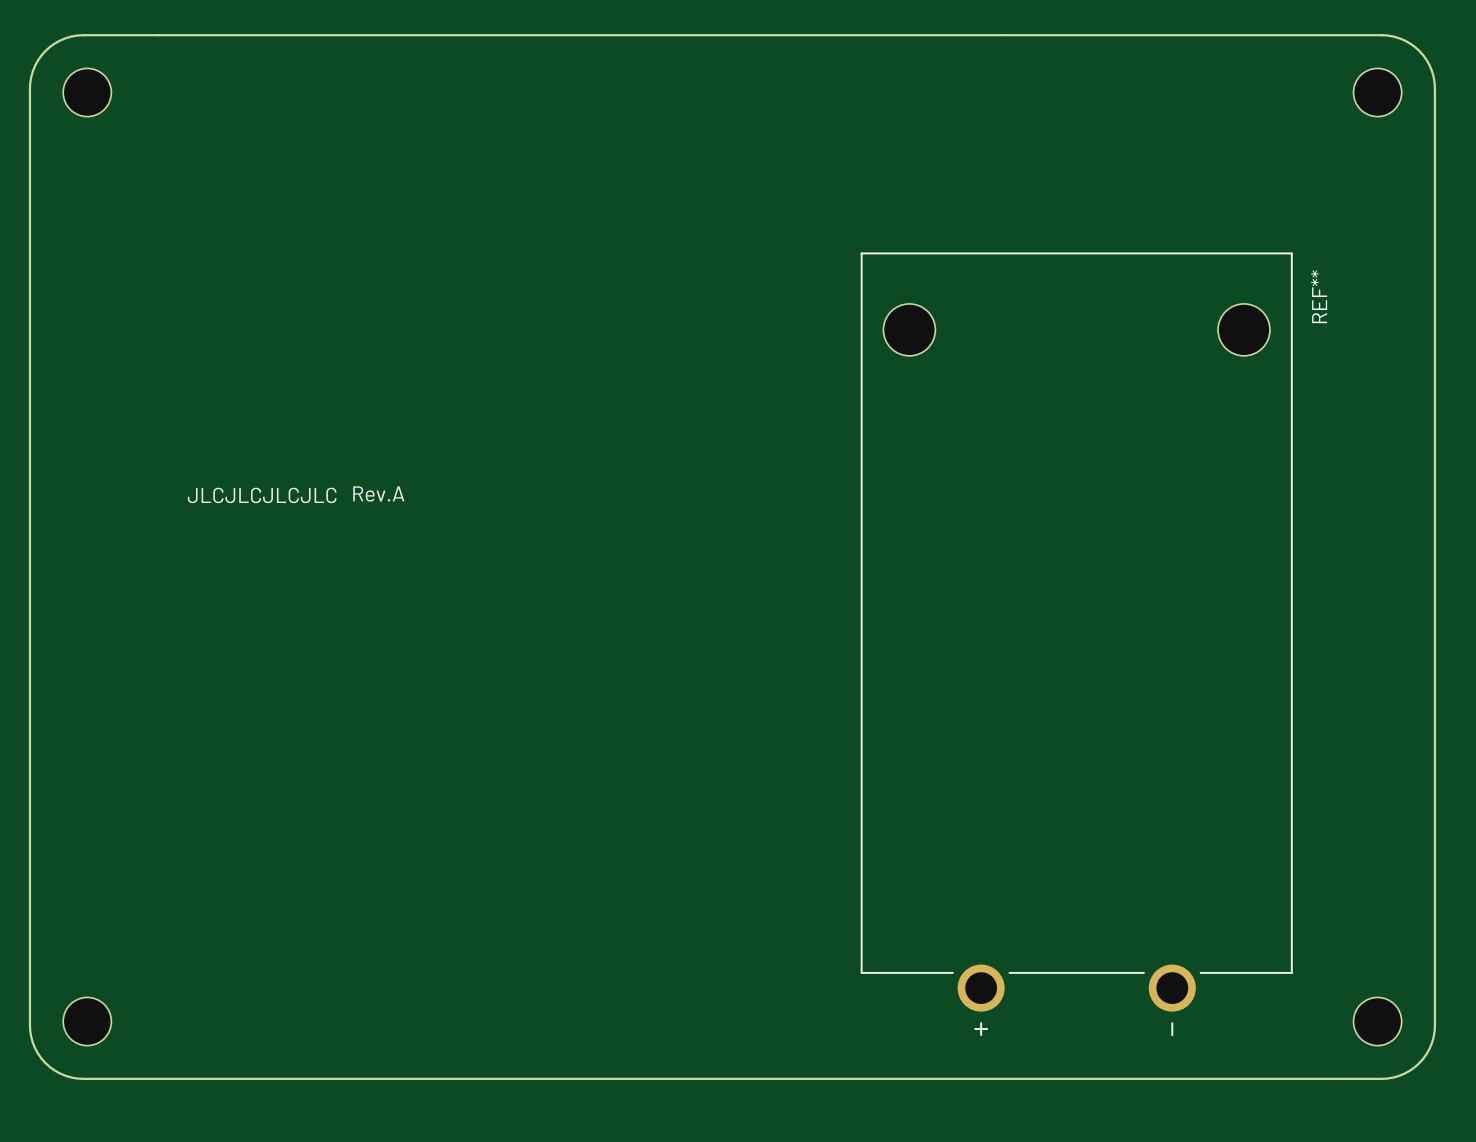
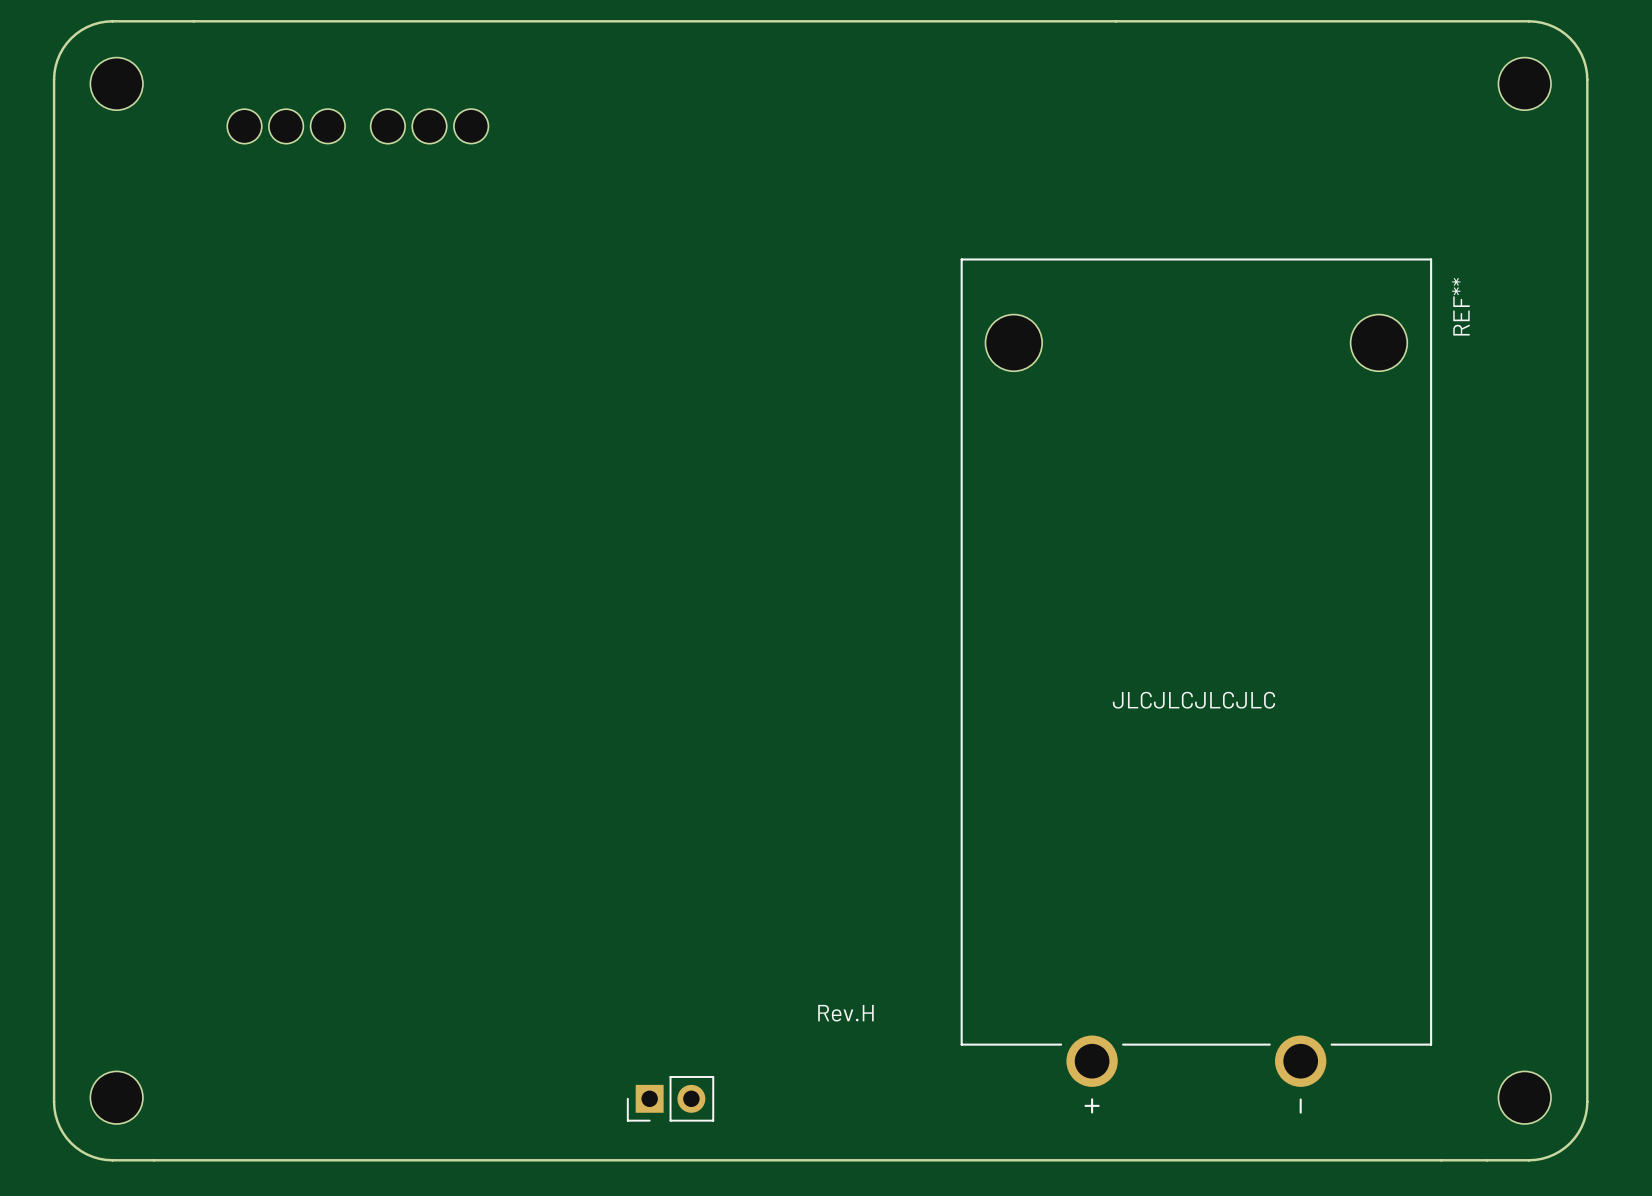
part: none -> (244, 126)
part: none -> (286, 126)
part: none -> (327, 126)
part: none -> (387, 126)
part: none -> (429, 126)
part: none -> (471, 126)
text: Rev.A (378, 494) -> none
text: JLCJLCJLCJLC (262, 495) -> none
text: none -> JLCJLCJLCJLC (1193, 700)
text: none -> Rev.H (845, 1013)
part: none -> (670, 1098)

